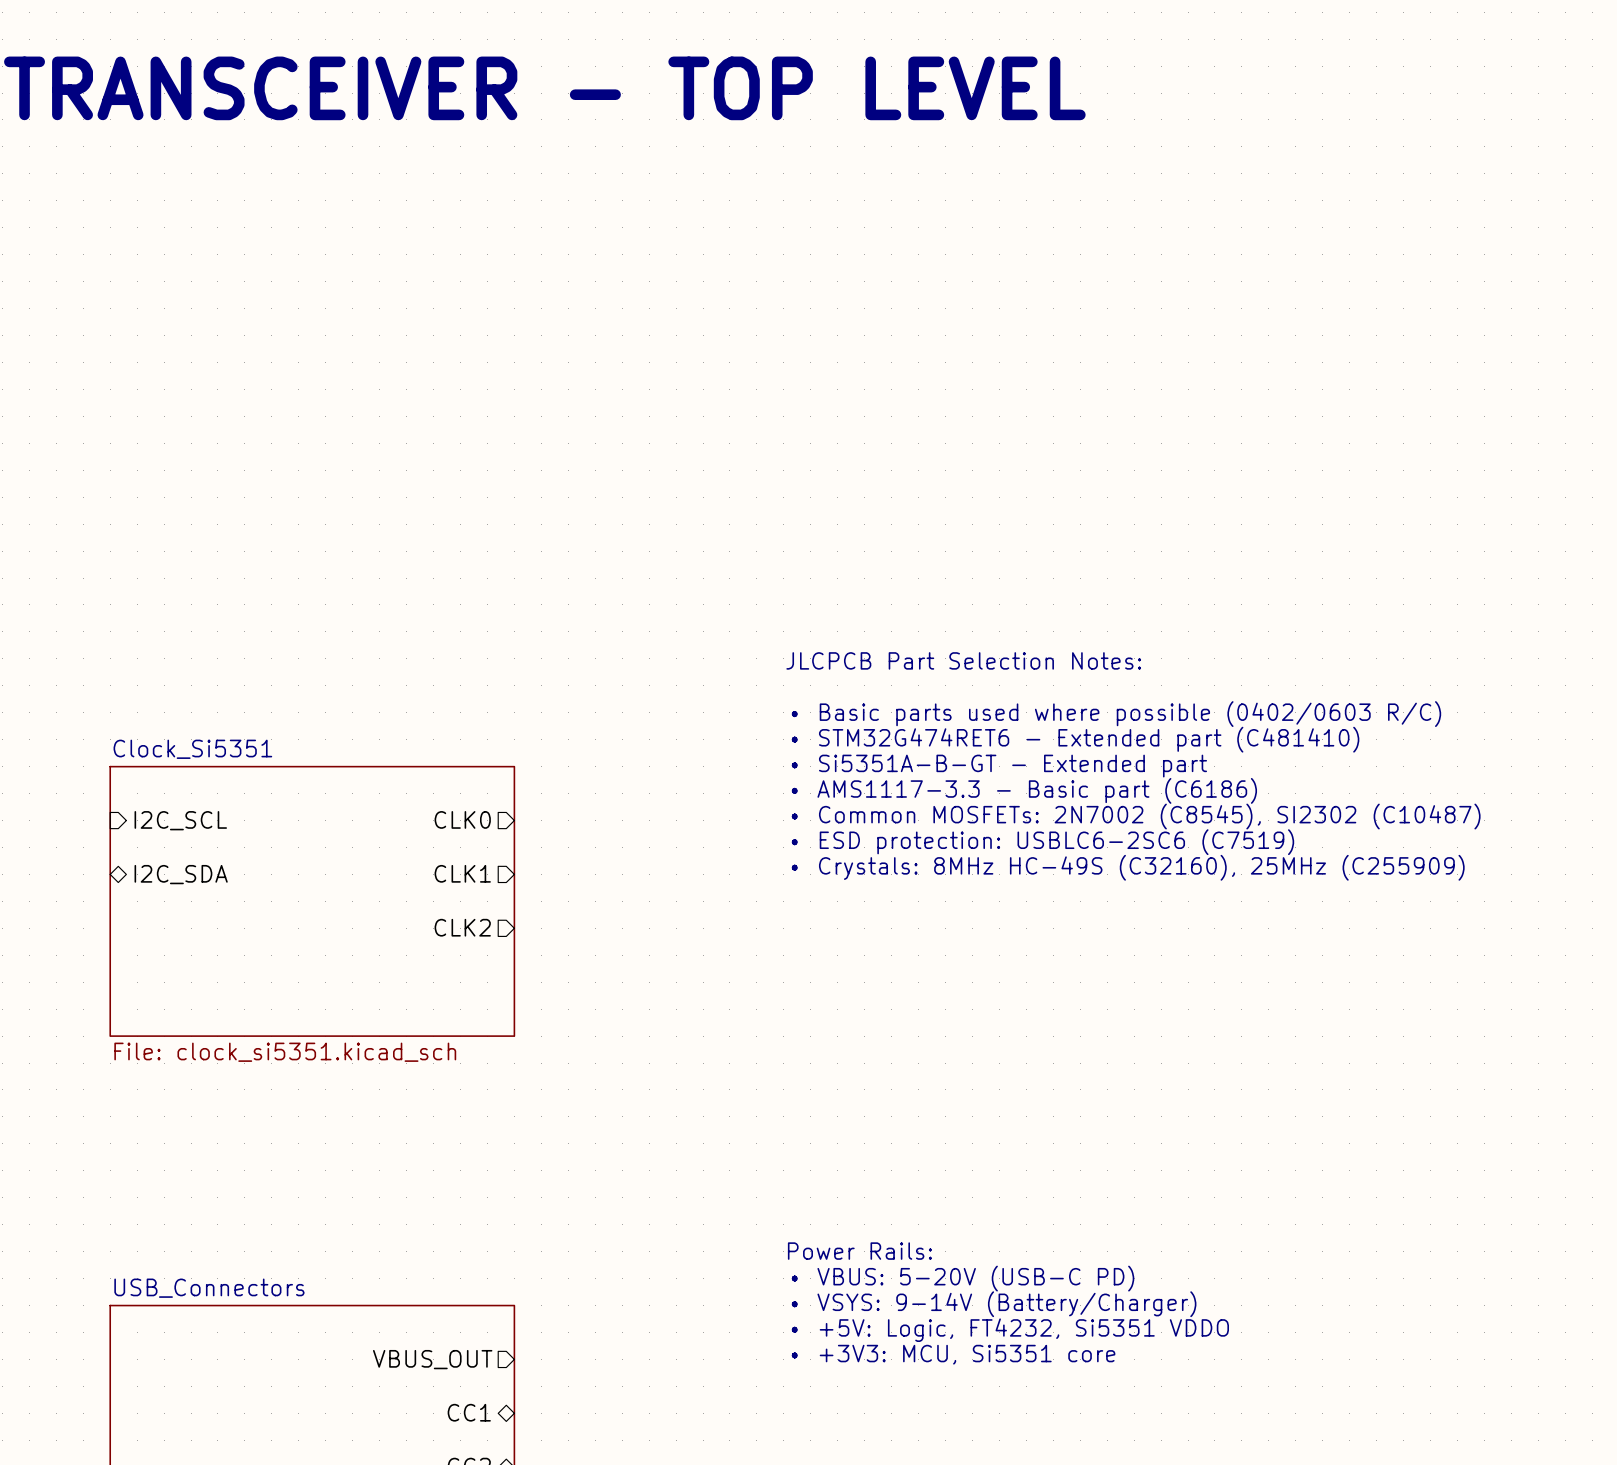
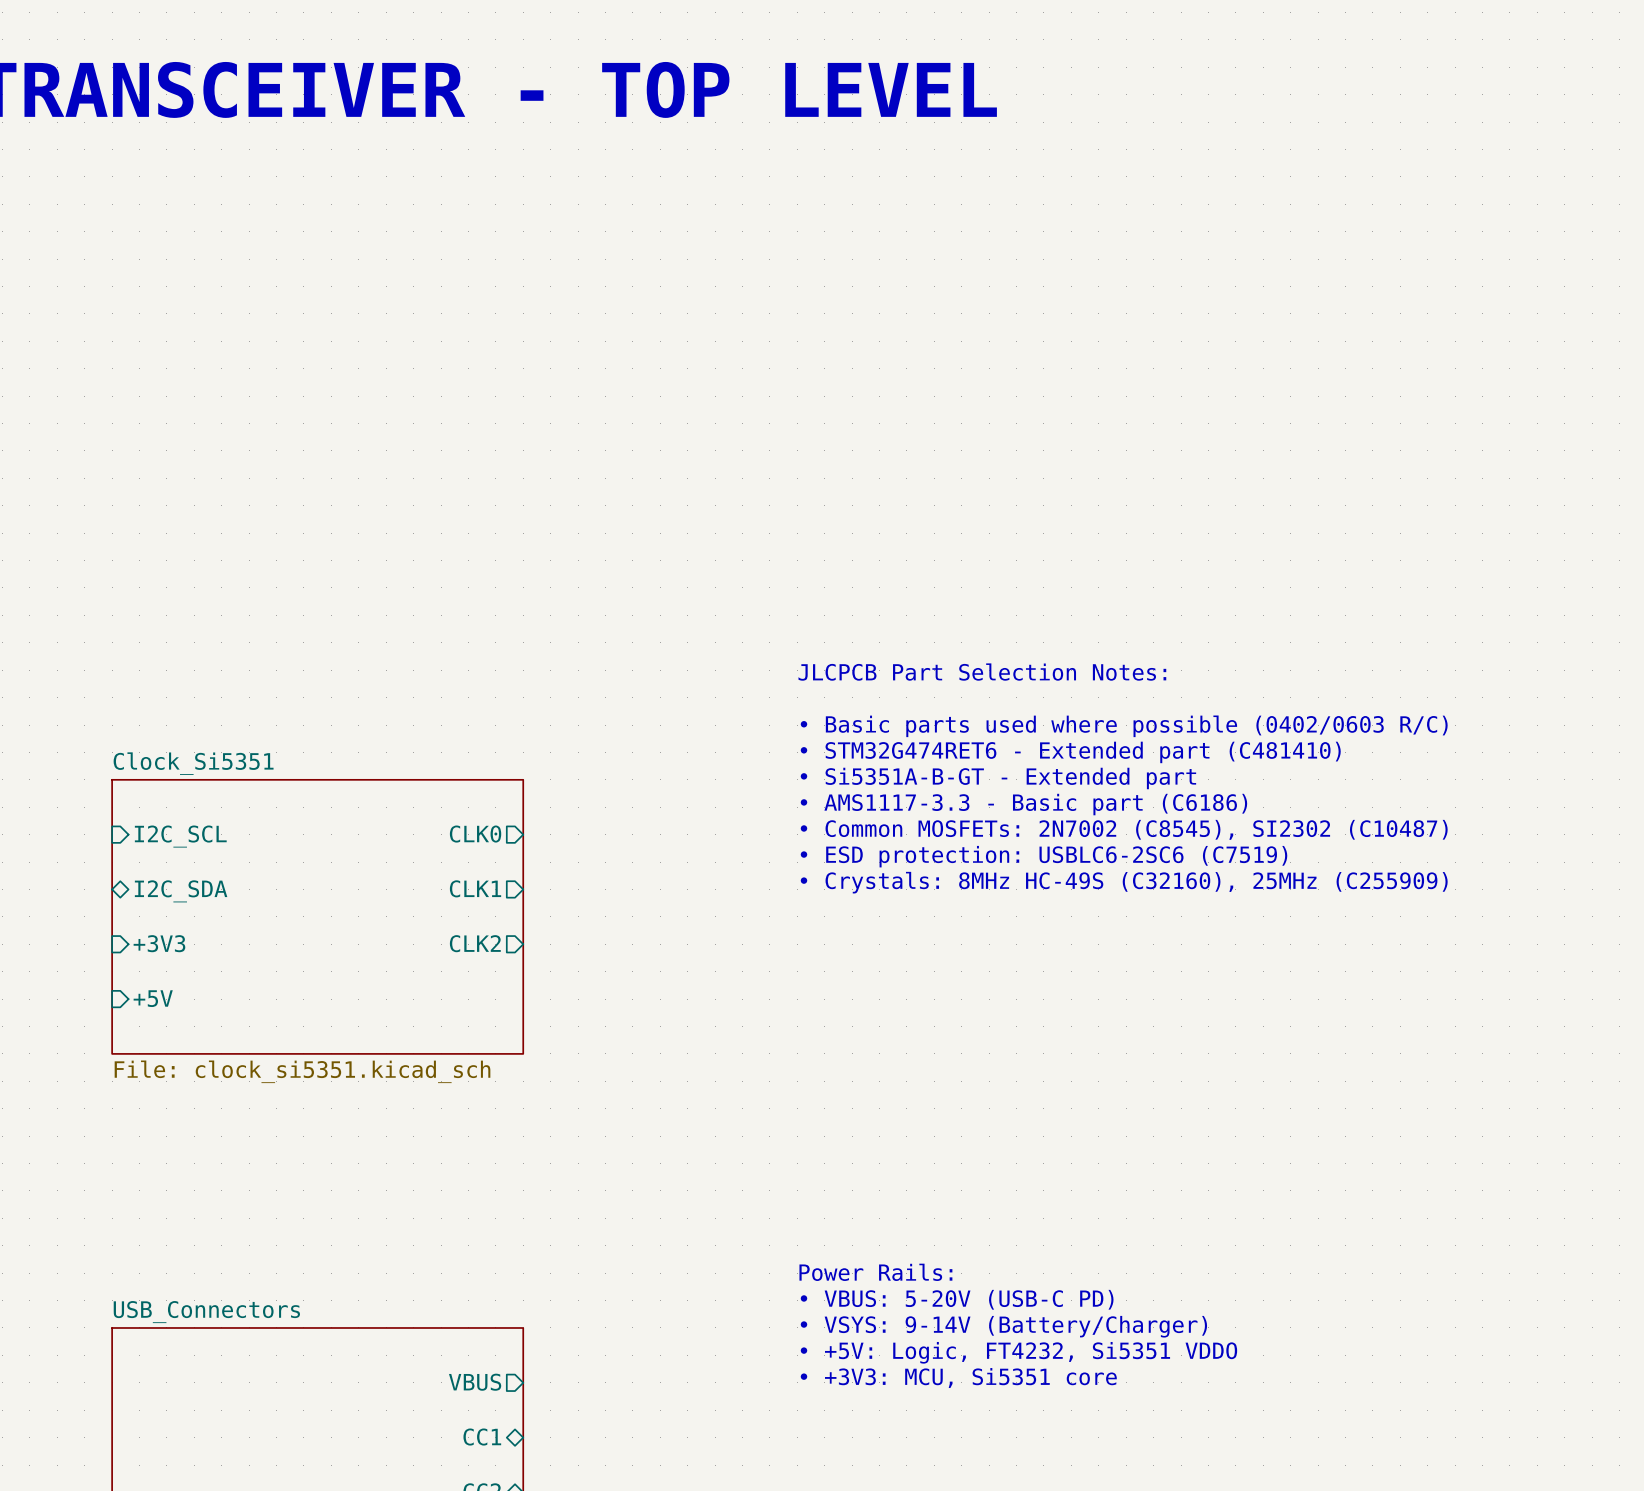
sheet pin: none -> +3V3 (159, 943)
sheet pin: none -> +5V (153, 998)
sheet pin: VBUS_OUT (432, 1359) -> VBUS (475, 1382)

